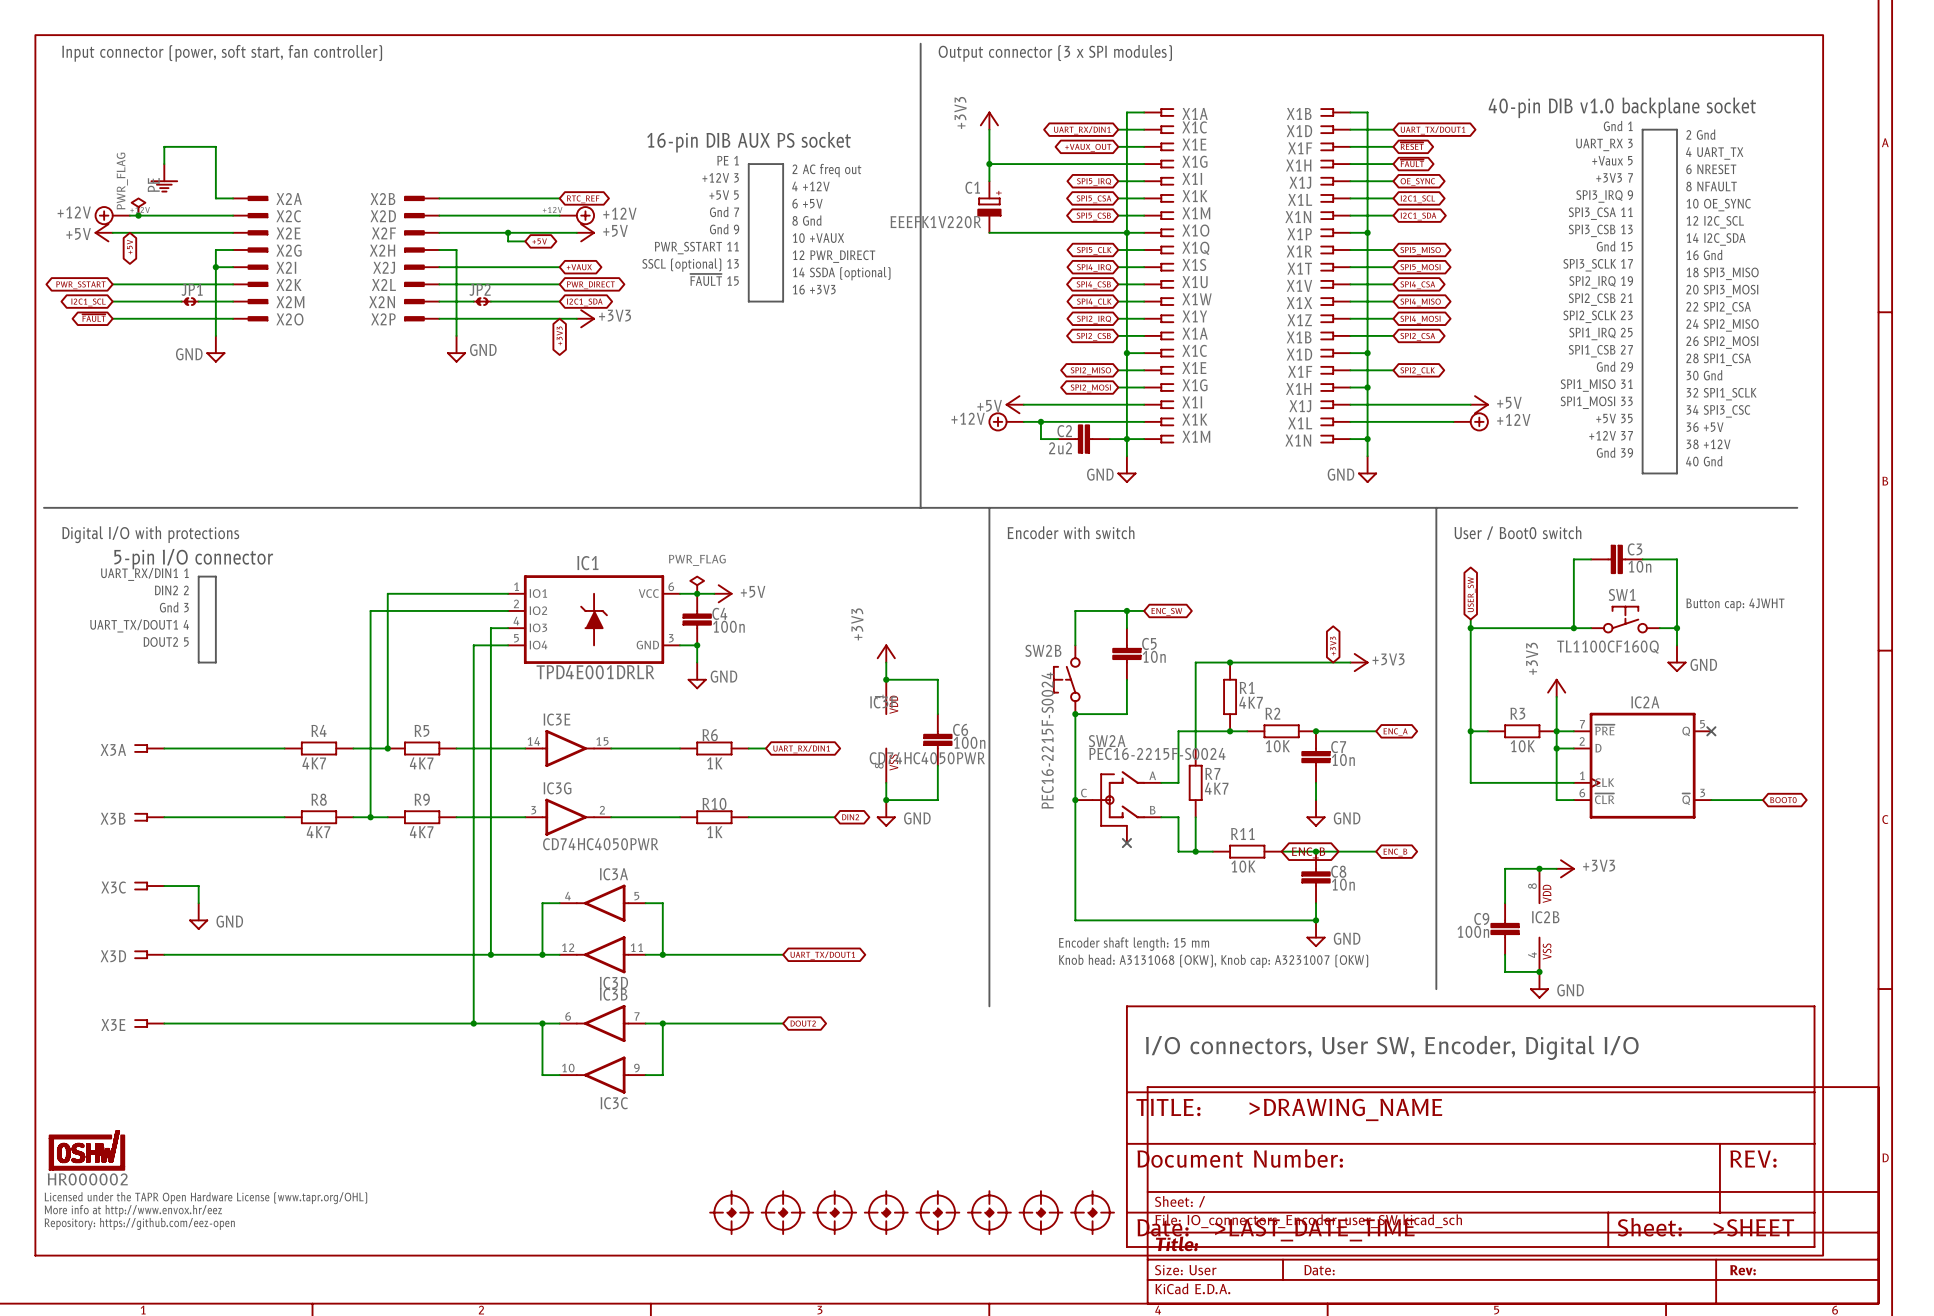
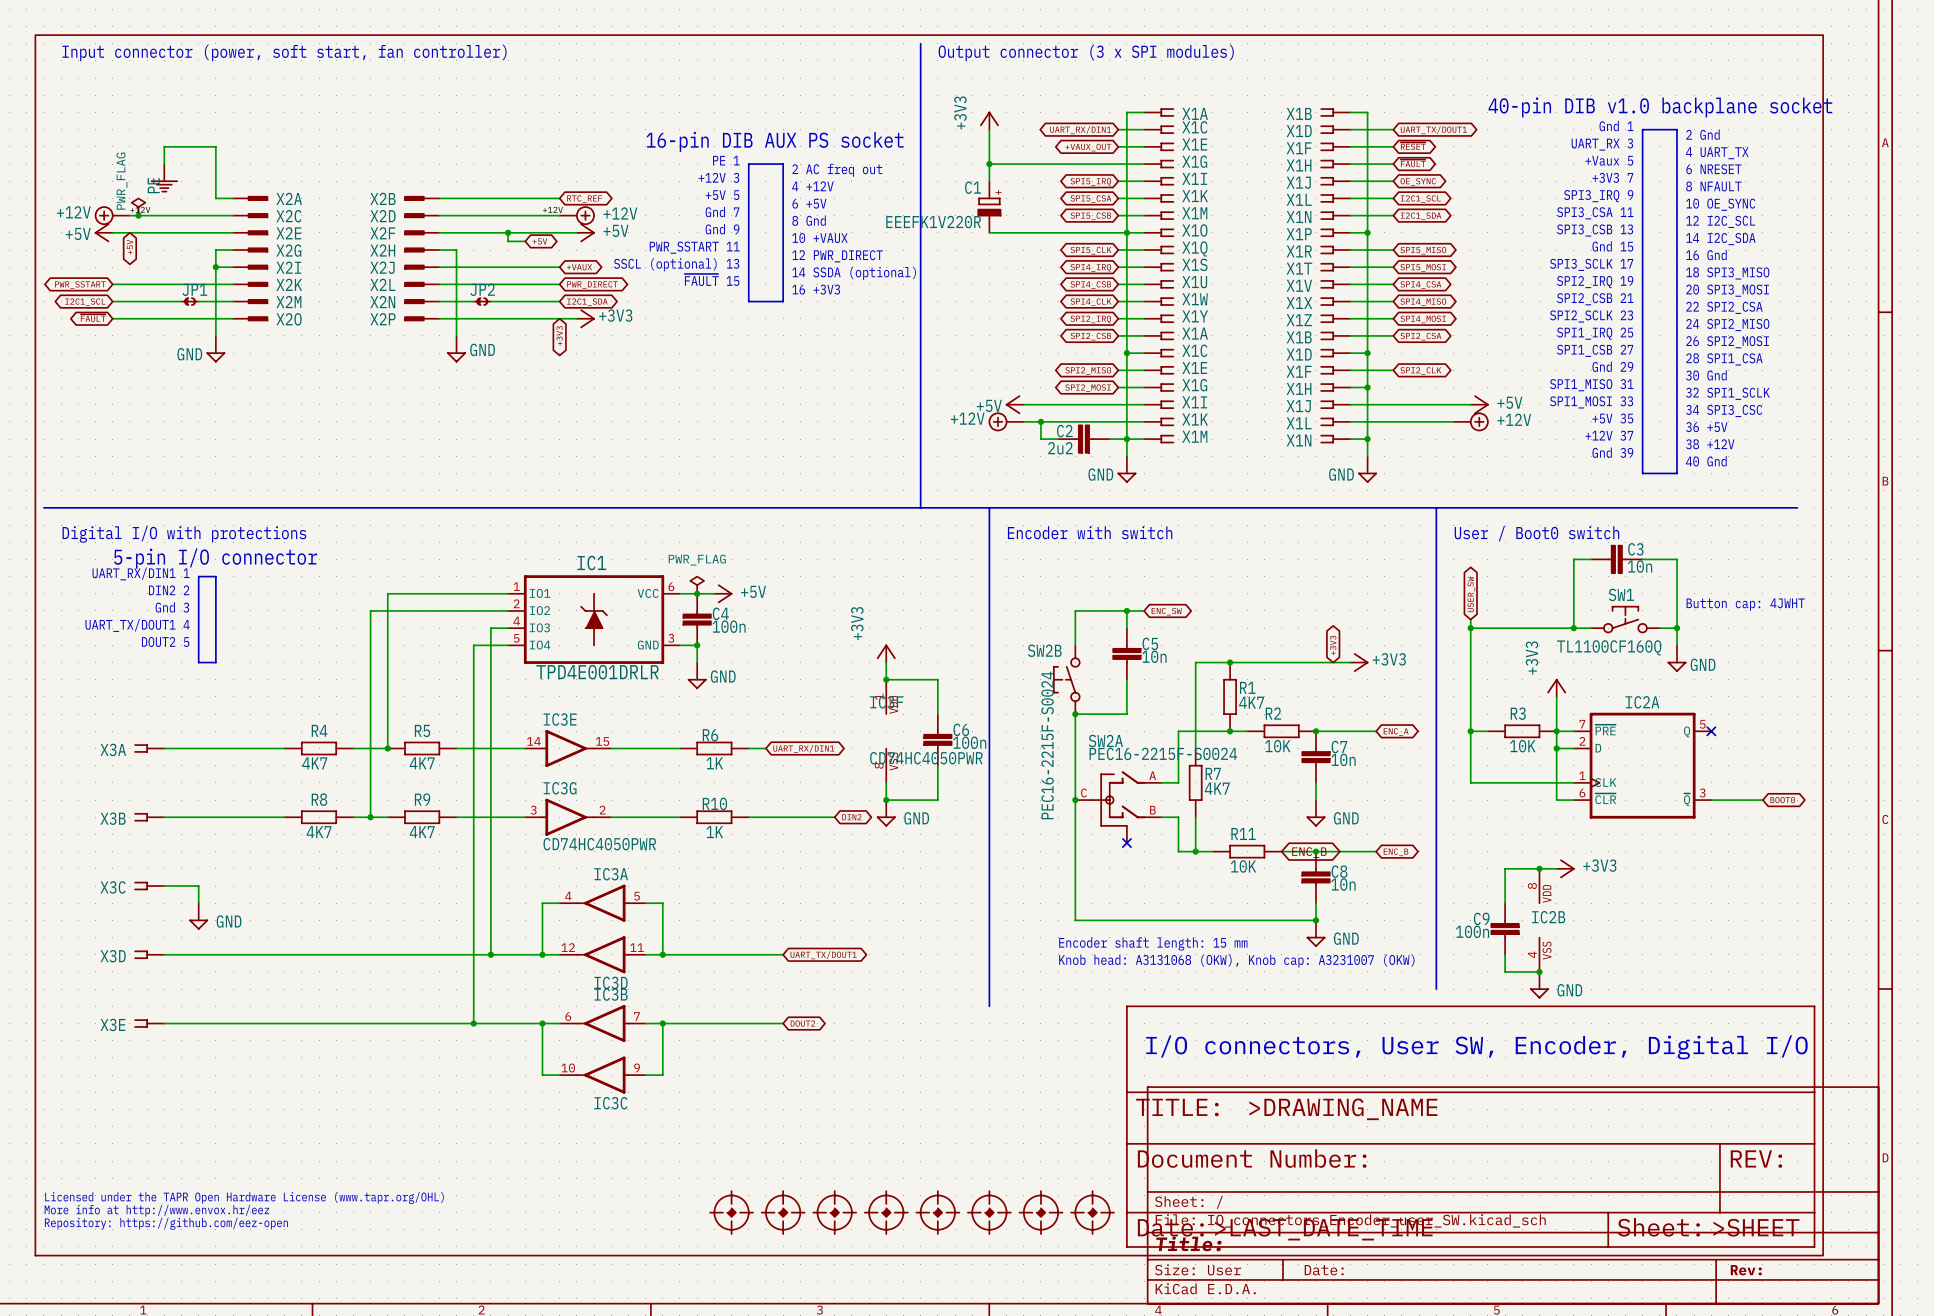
part: HR000002 (86, 1150) -> none

